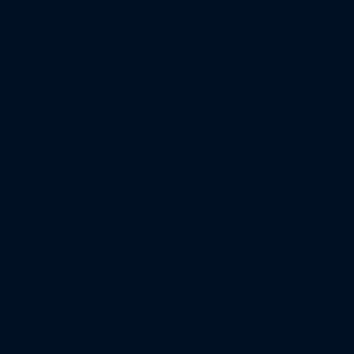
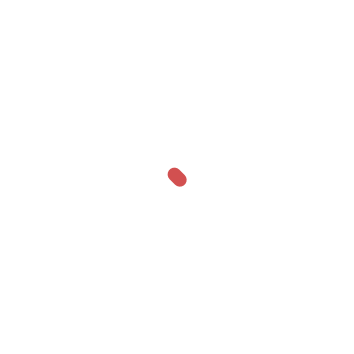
track: none -> (174, 174) (179, 179)

